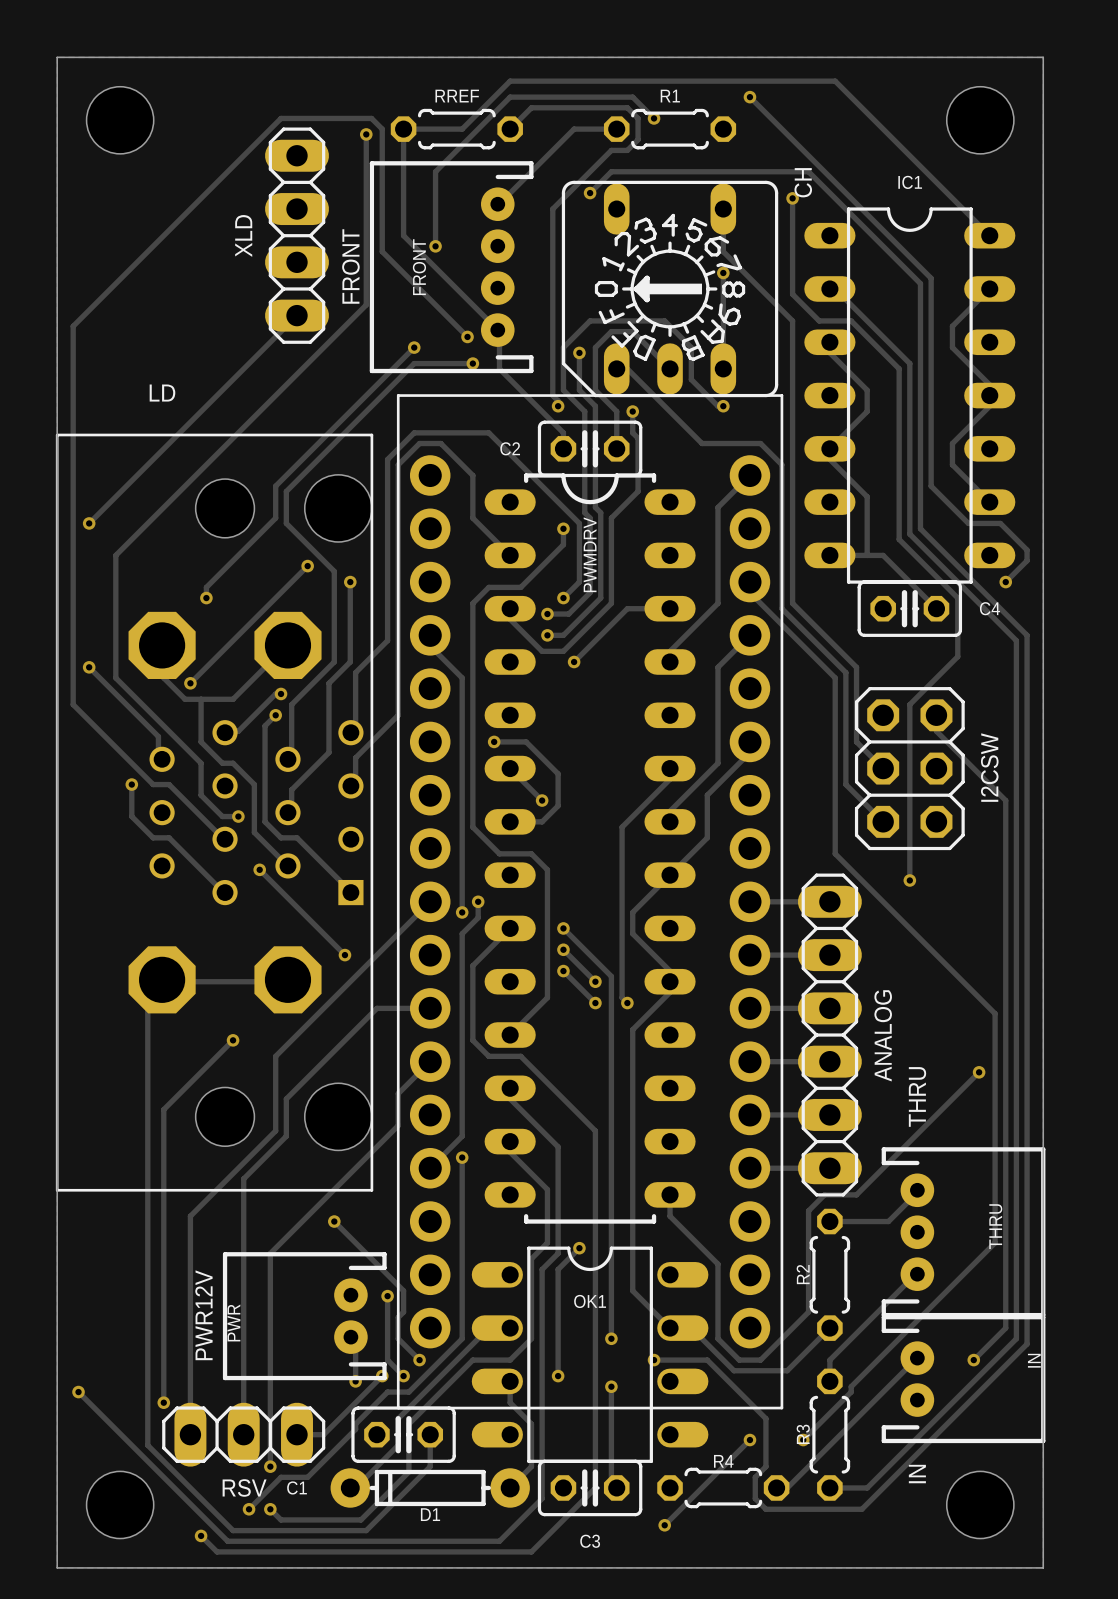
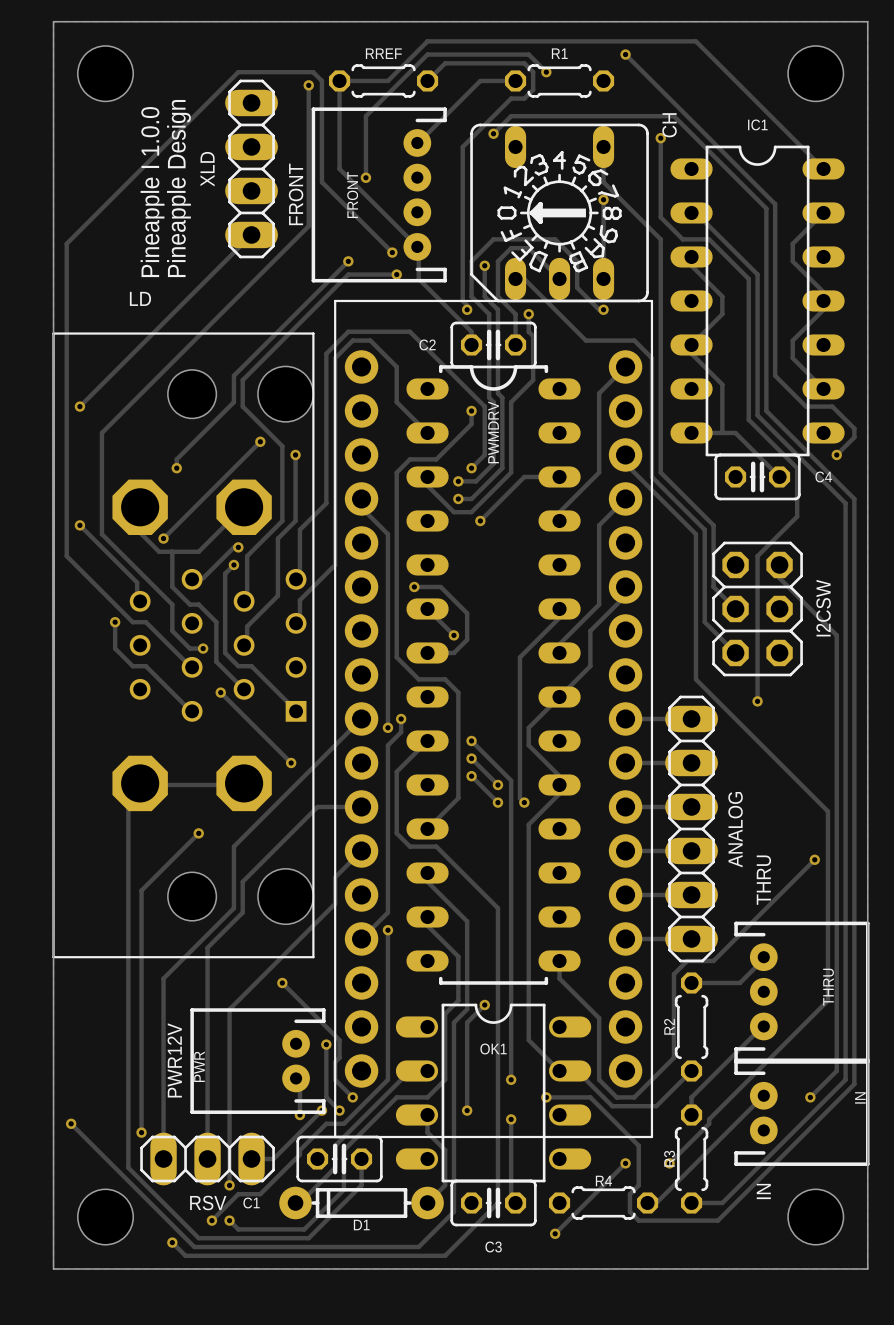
text: none -> Pineapple Design (178, 188)
text: none -> Pineapple I 1.0.0 (152, 192)

